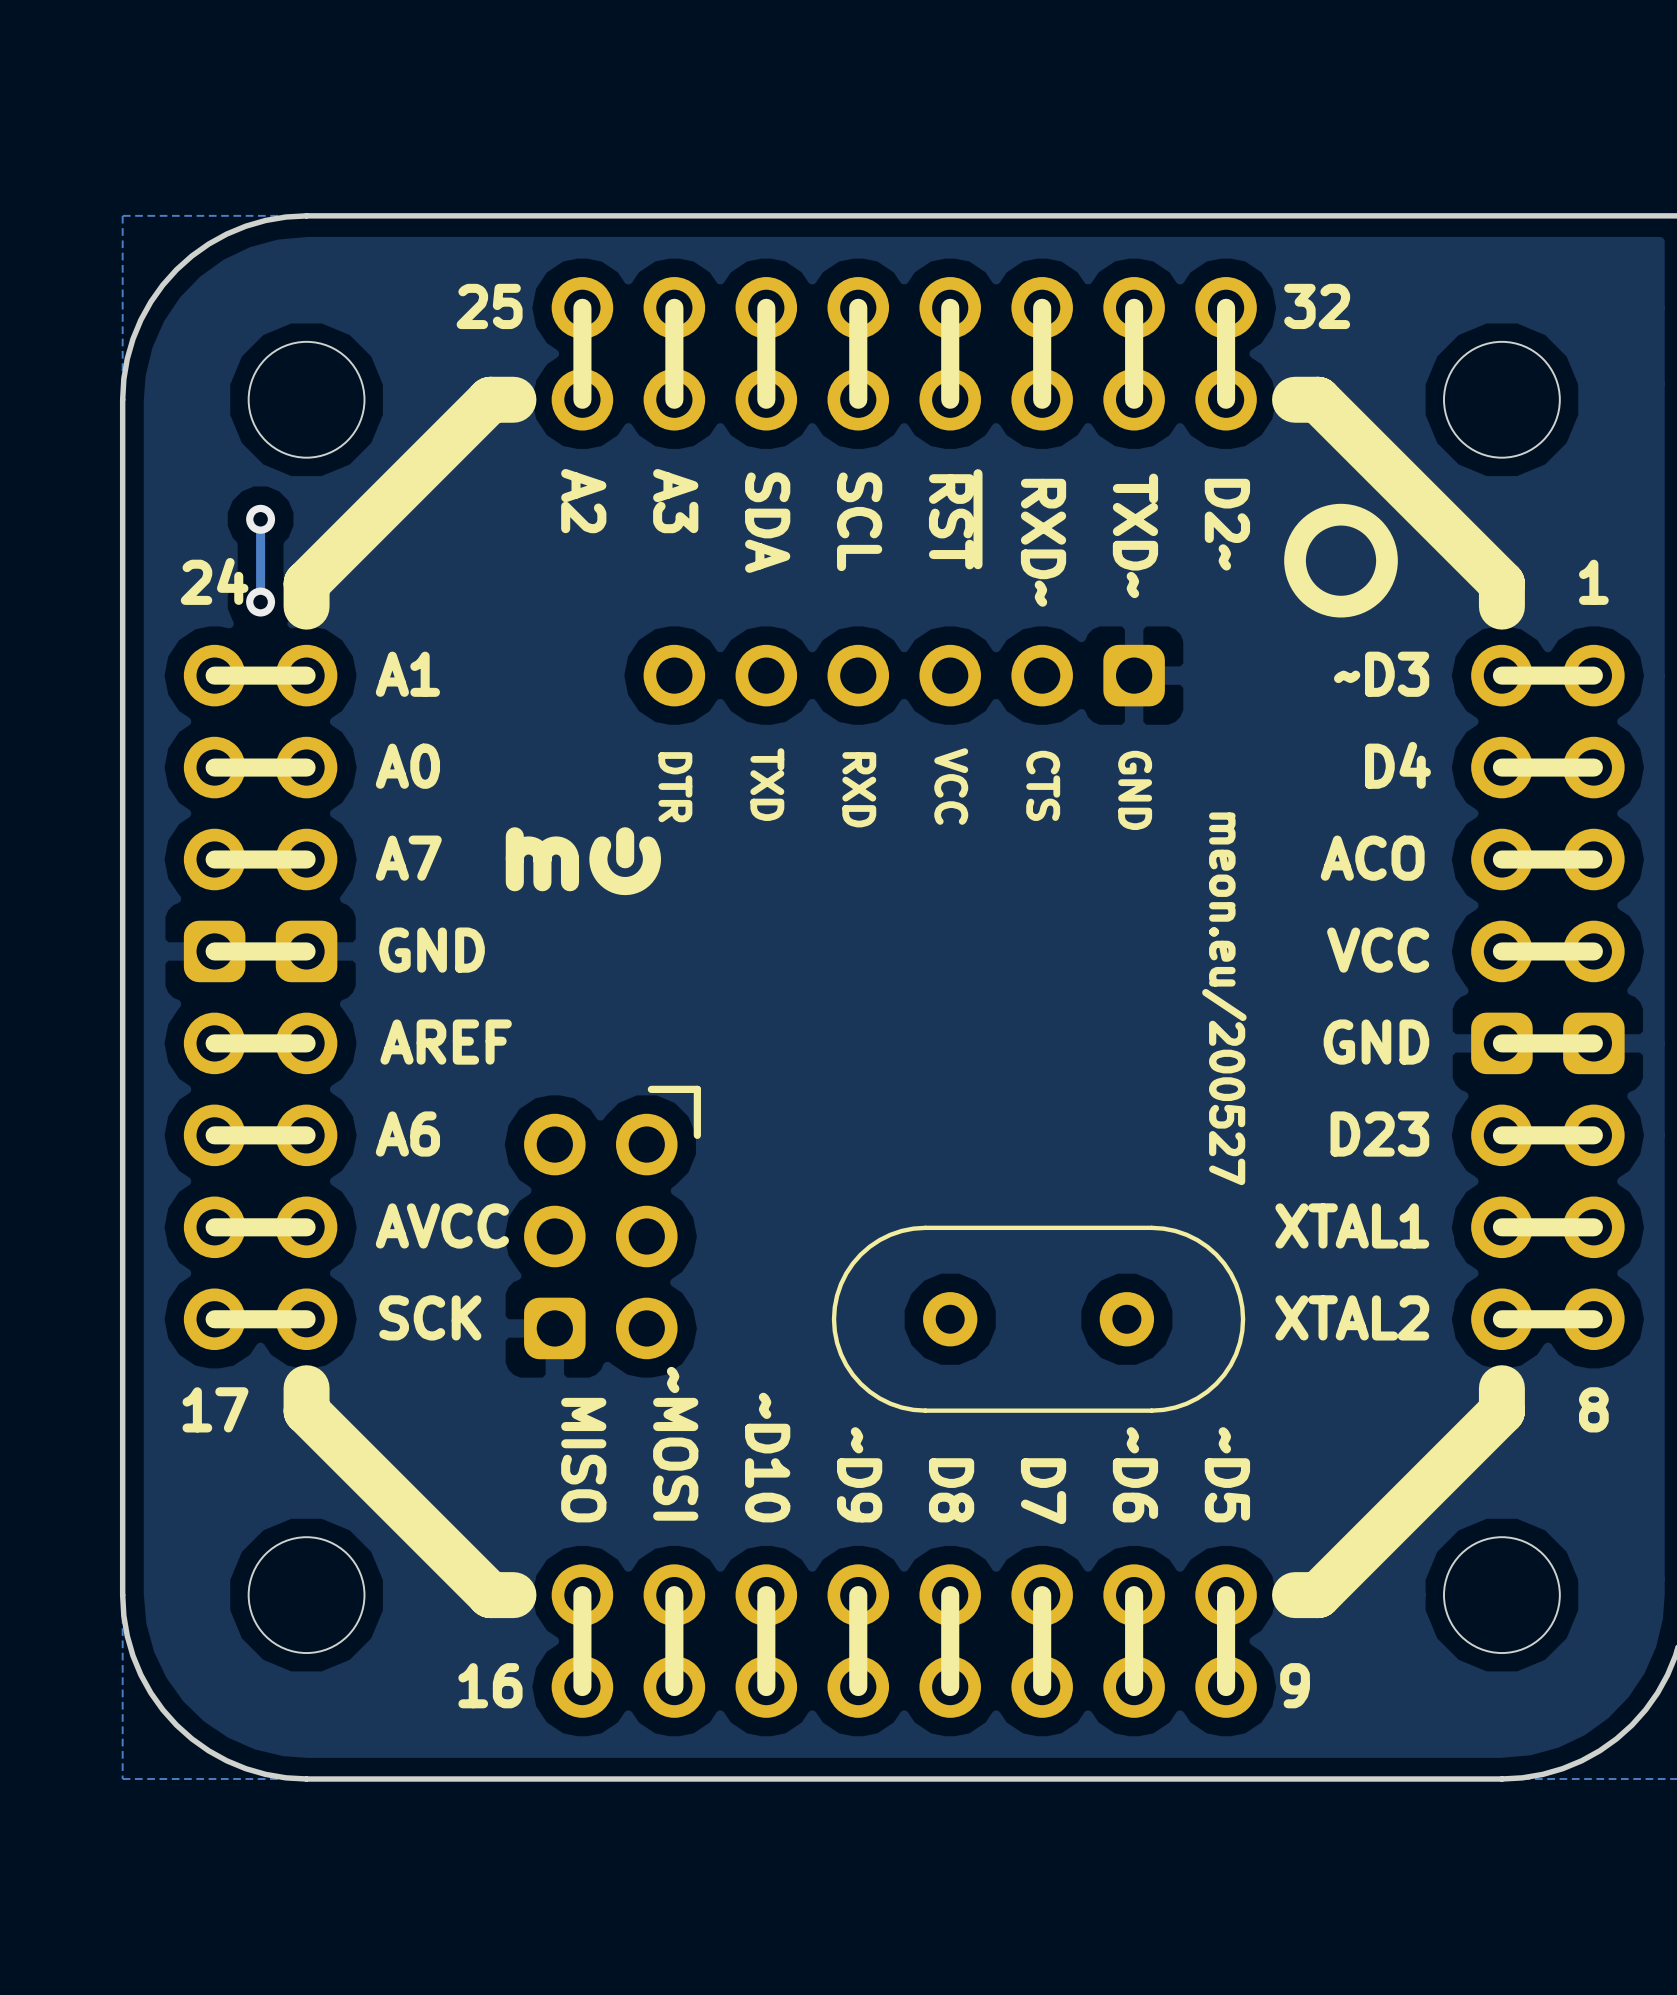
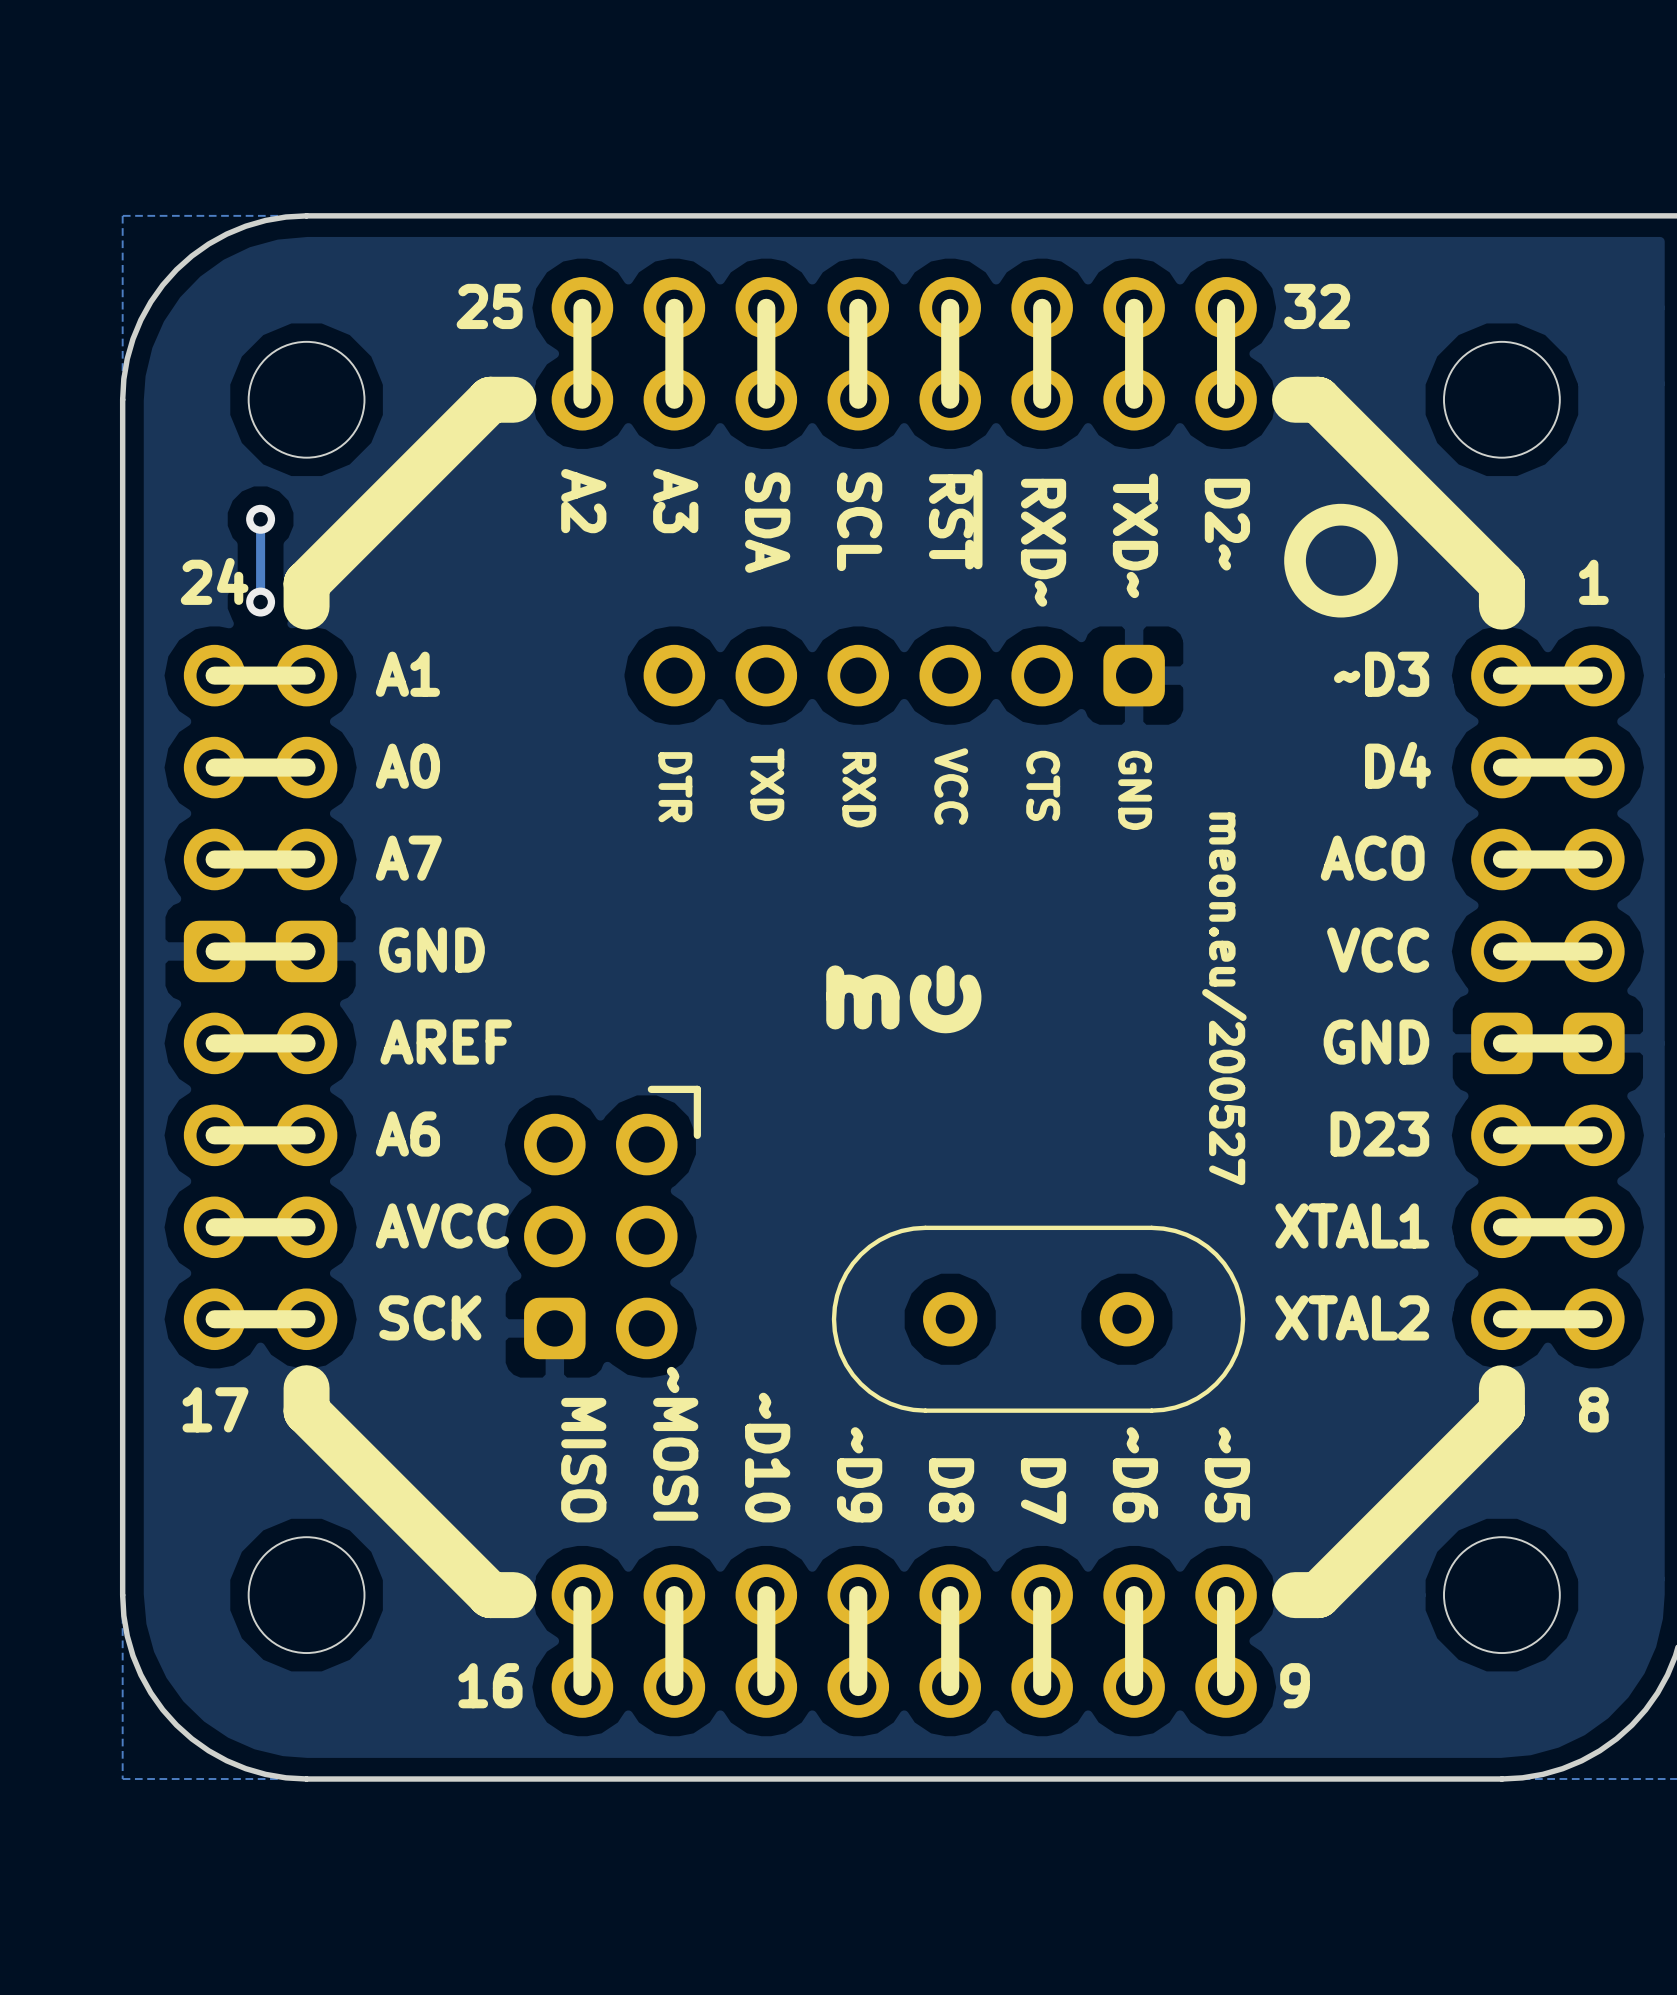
drawing position: (583, 861) -> (903, 999)

